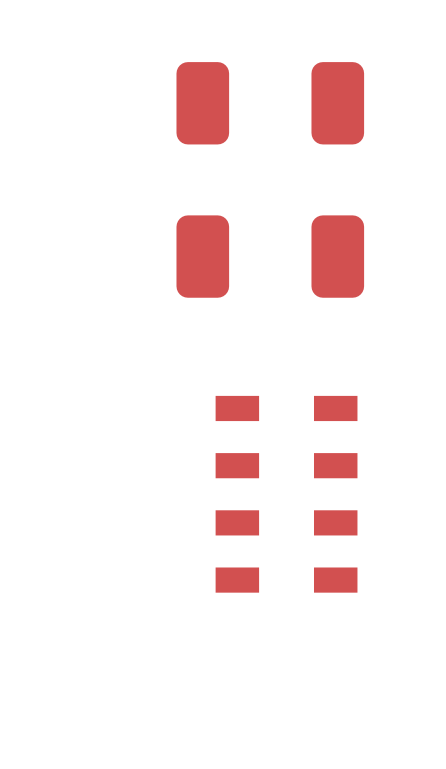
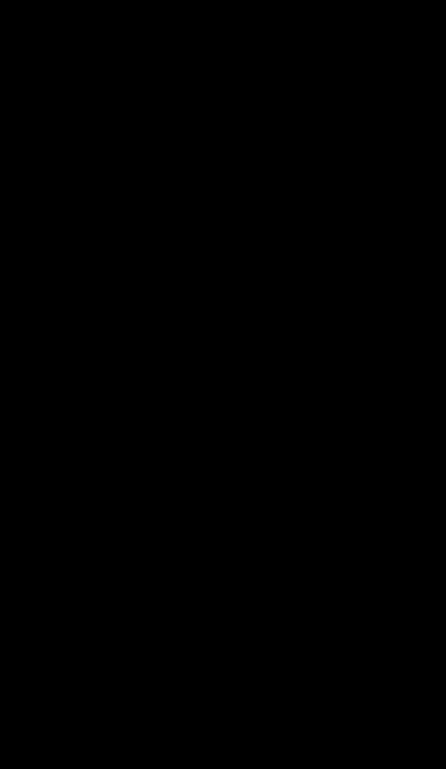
part: (270, 103) -> none
part: (270, 256) -> none
part: (286, 494) -> none

